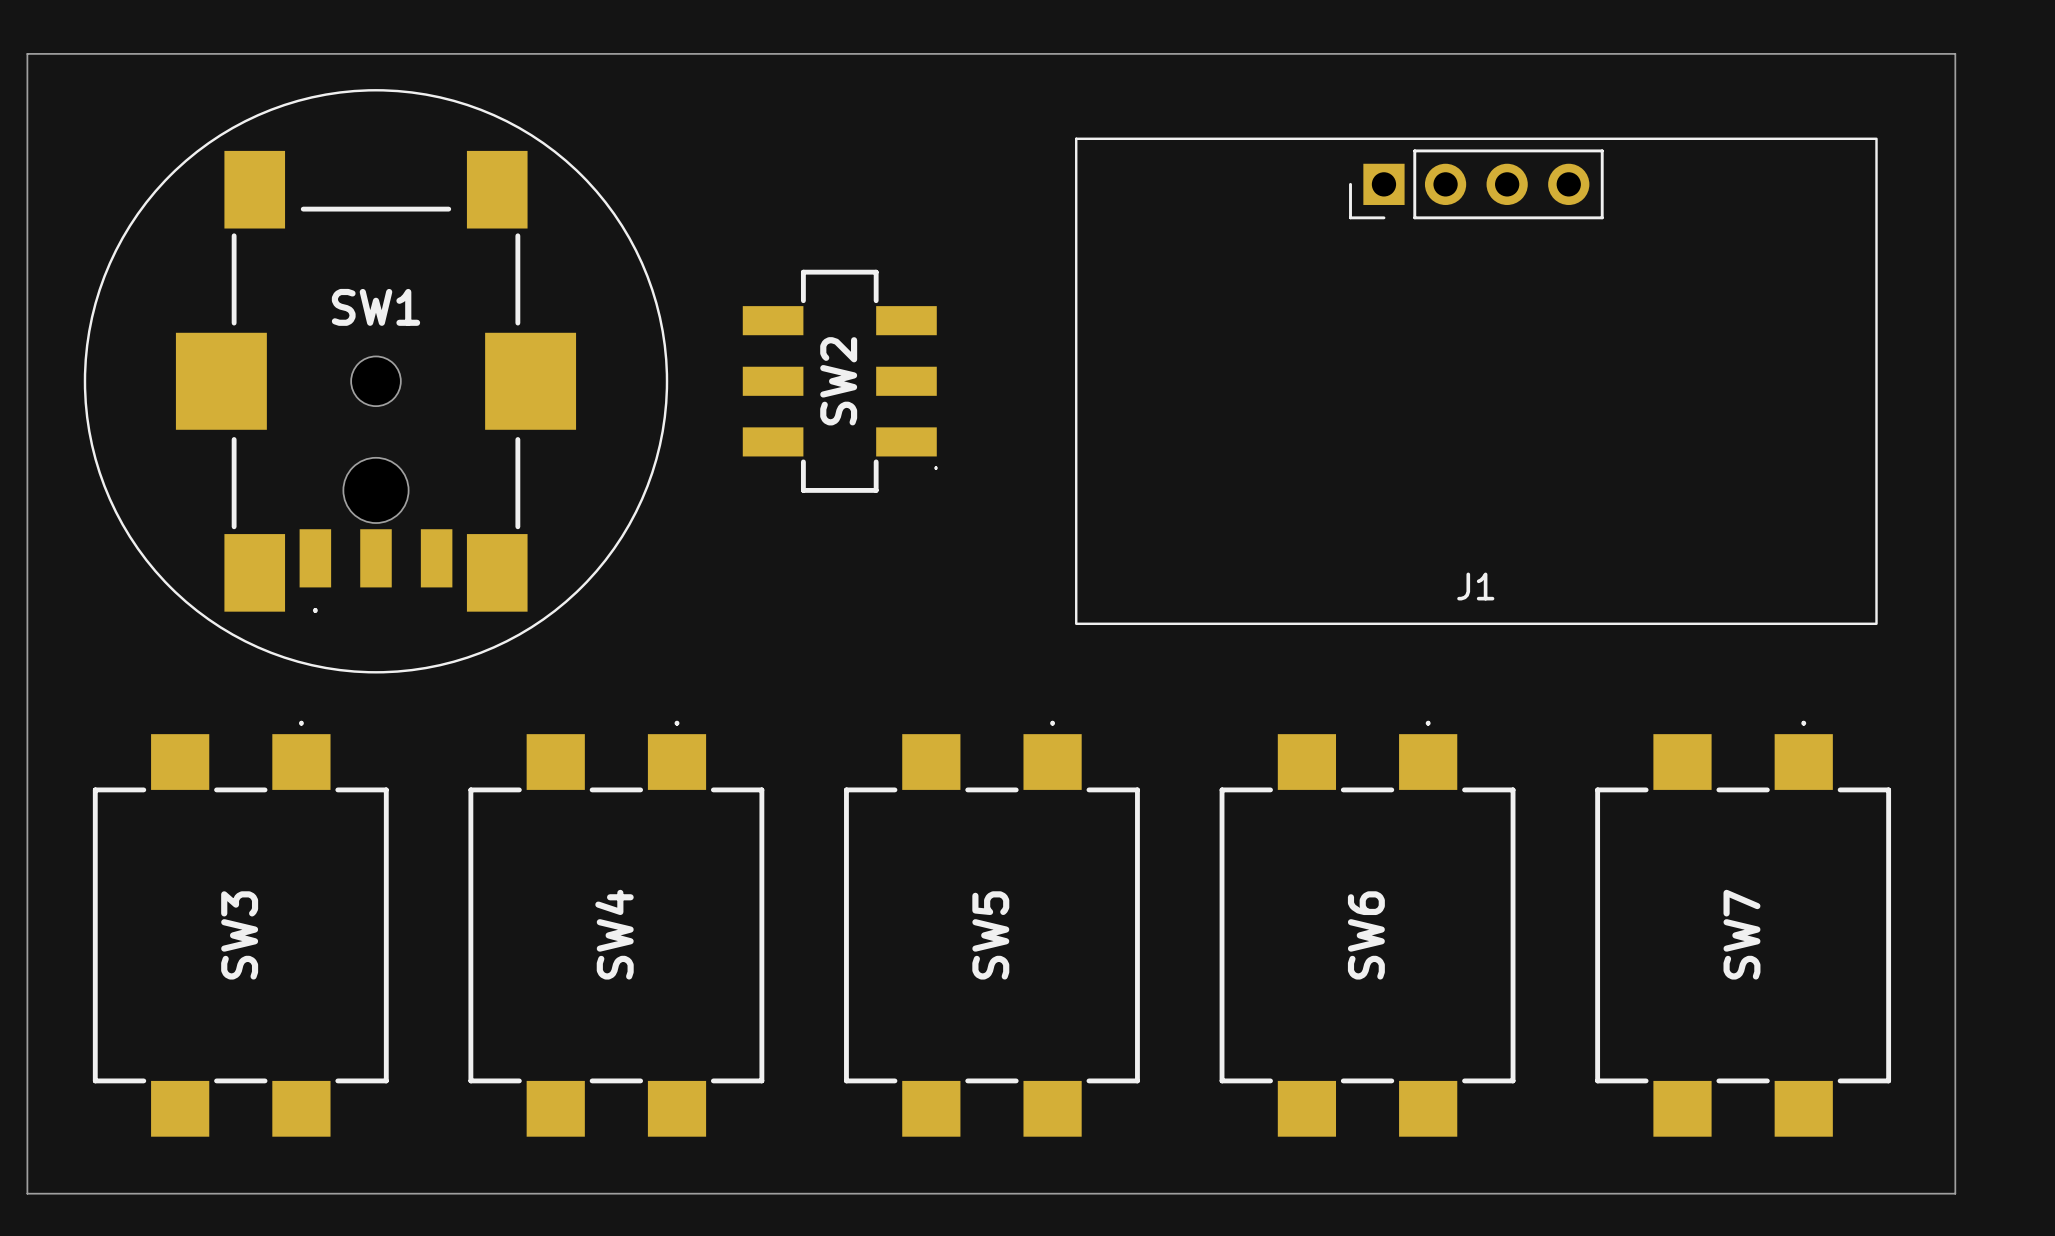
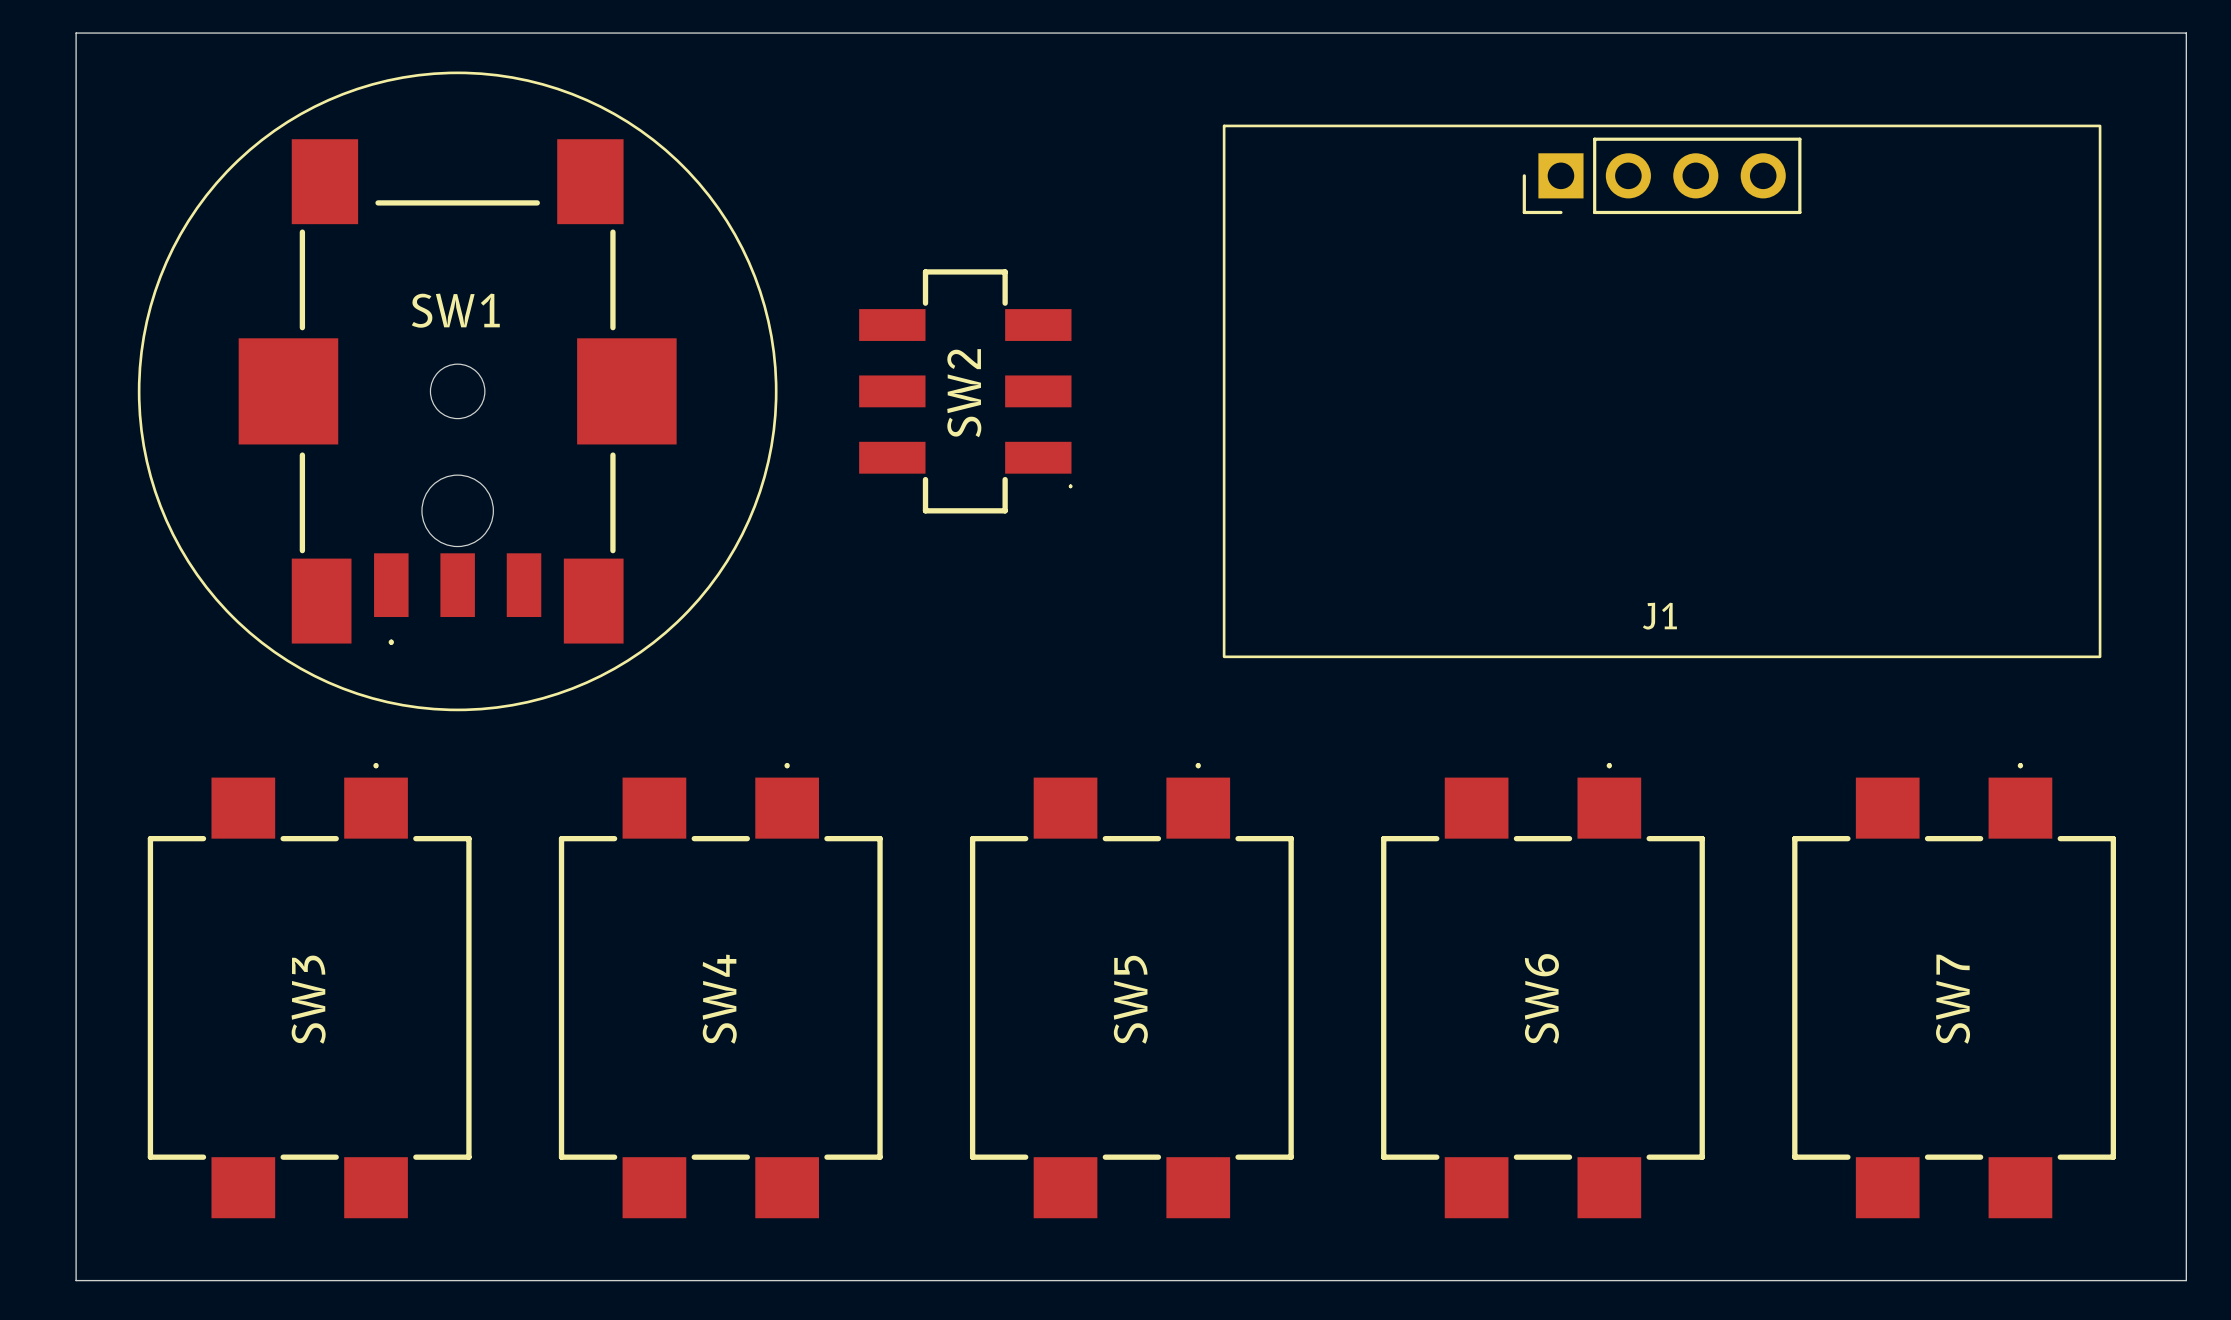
SW1 footprint: [83, 89, 669, 674] -> [137, 71, 778, 712]

